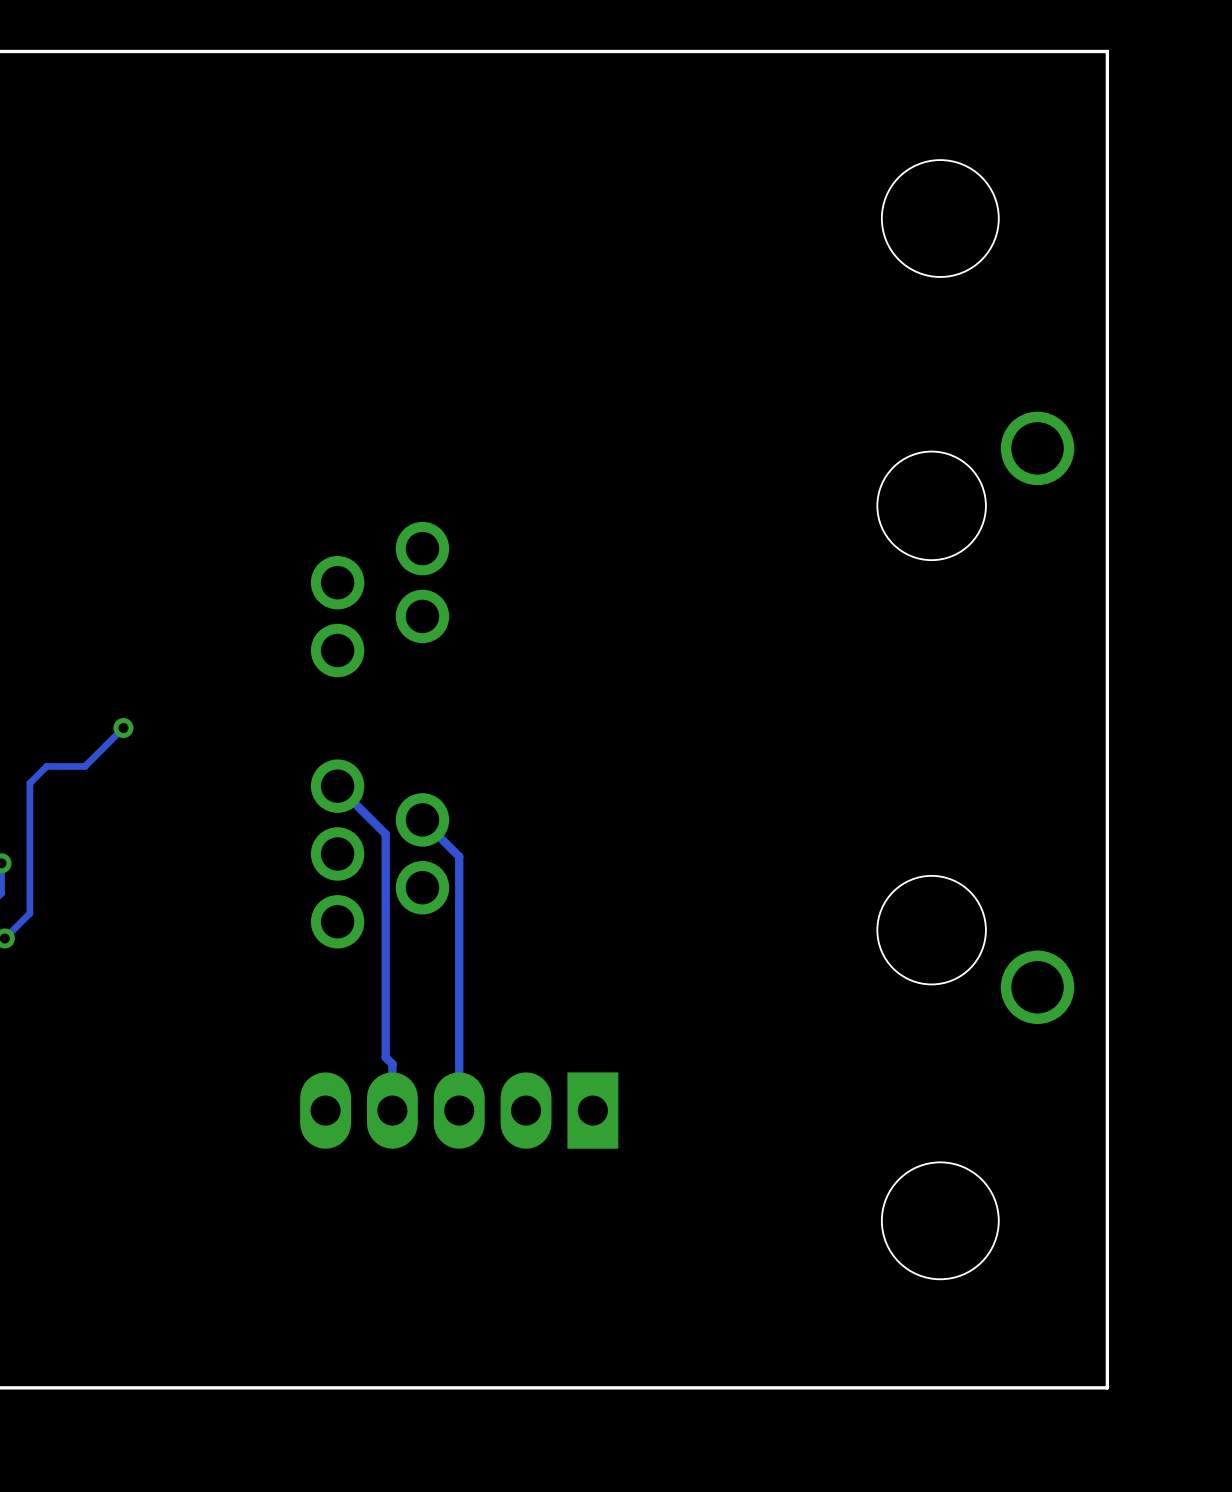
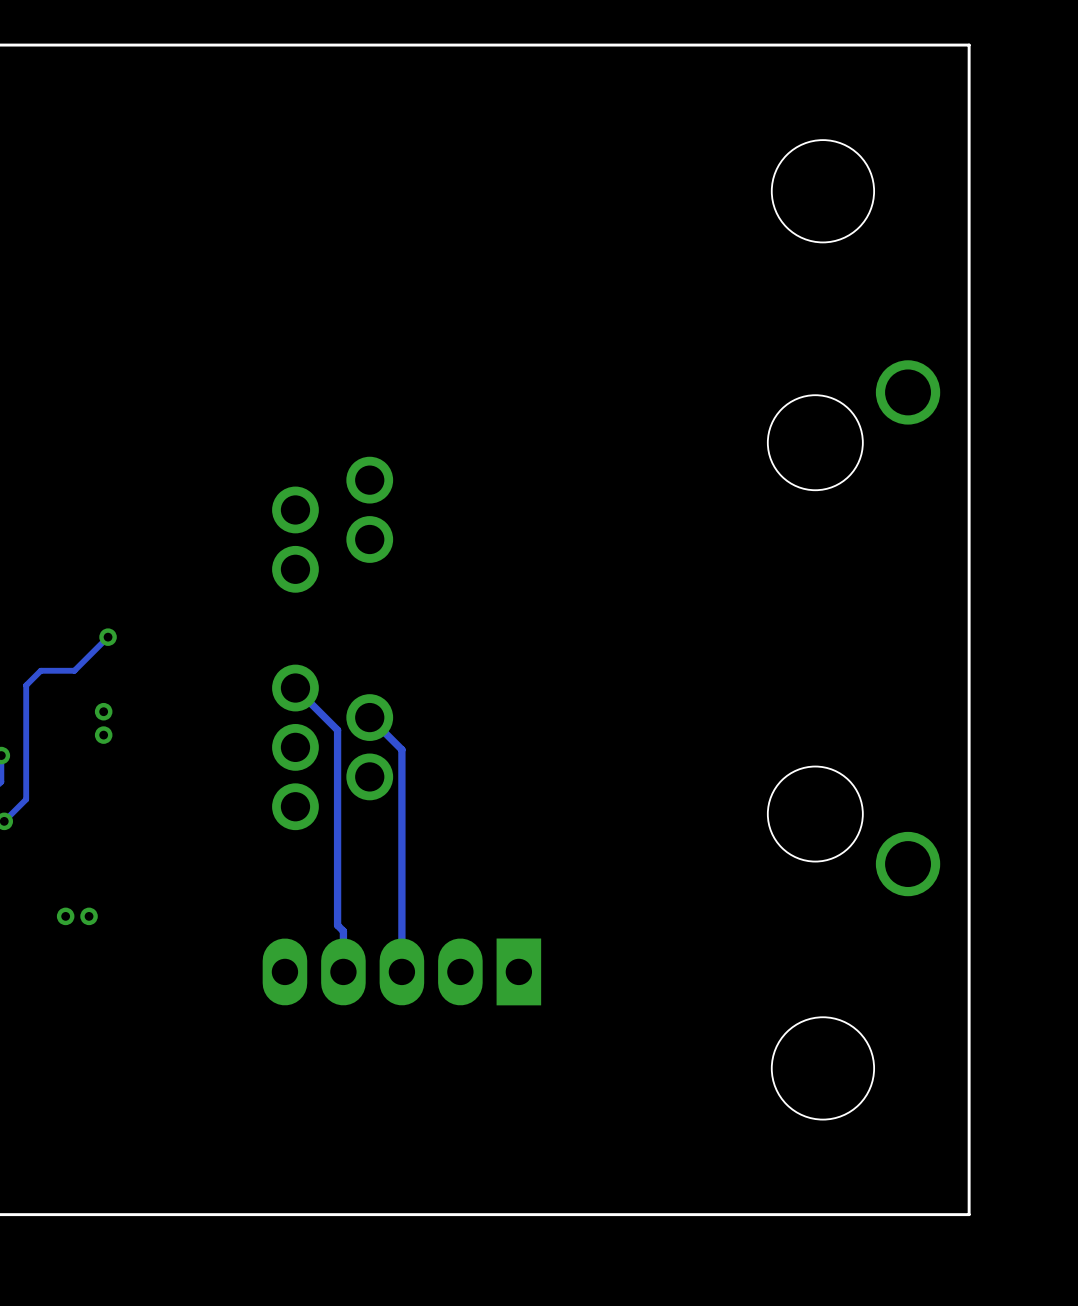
part: none -> (103, 711)
part: none -> (103, 735)
part: none -> (65, 916)
part: none -> (89, 916)

